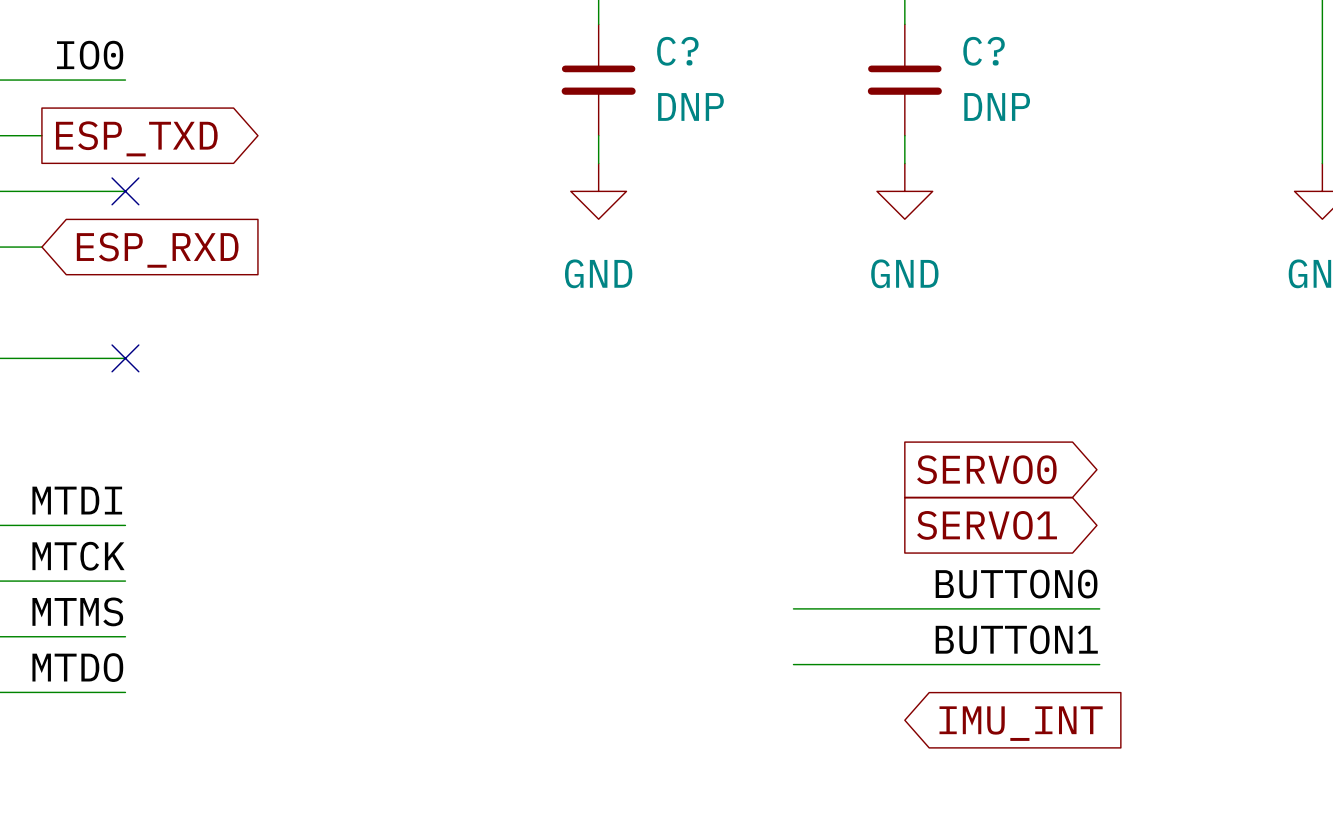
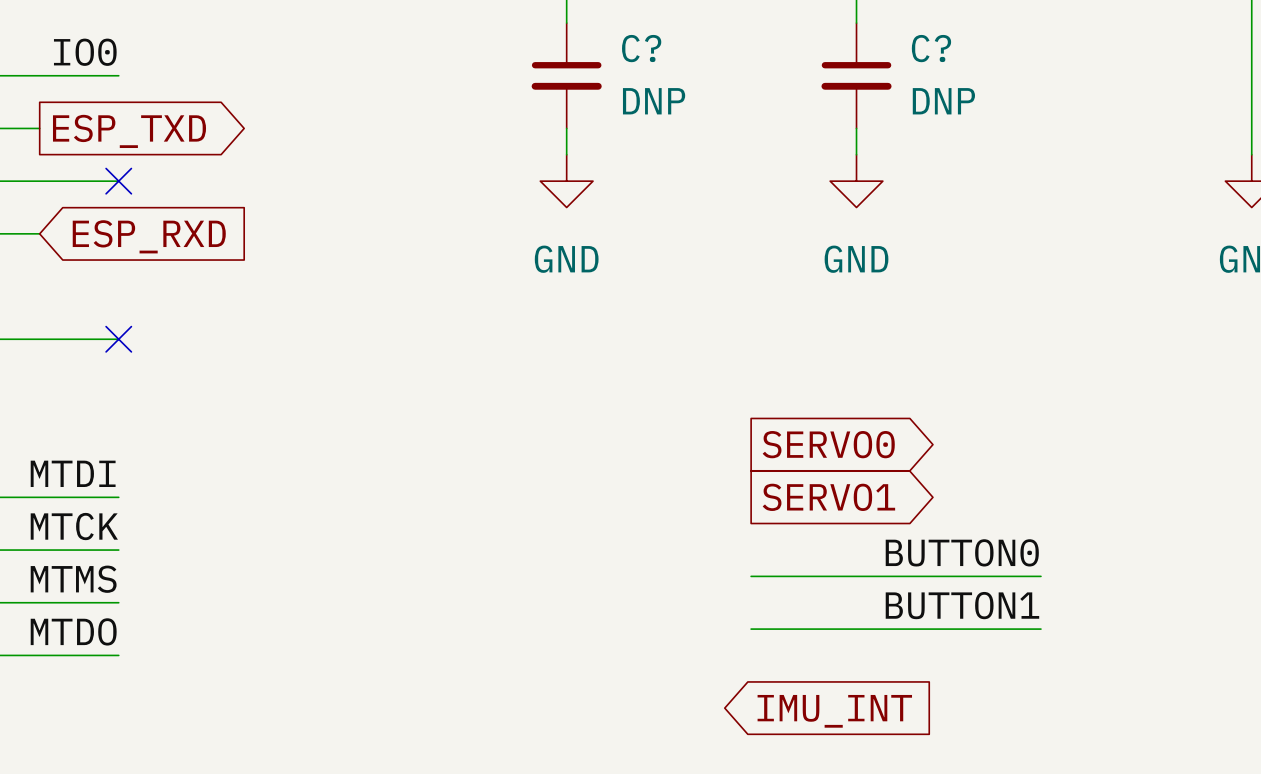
global label position: SERVO0 (986, 469) -> SERVO0 (828, 444)
global label position: SERVO1 (987, 525) -> SERVO1 (828, 497)
global label position: IMU_INT (1021, 723) -> IMU_INT (834, 711)

